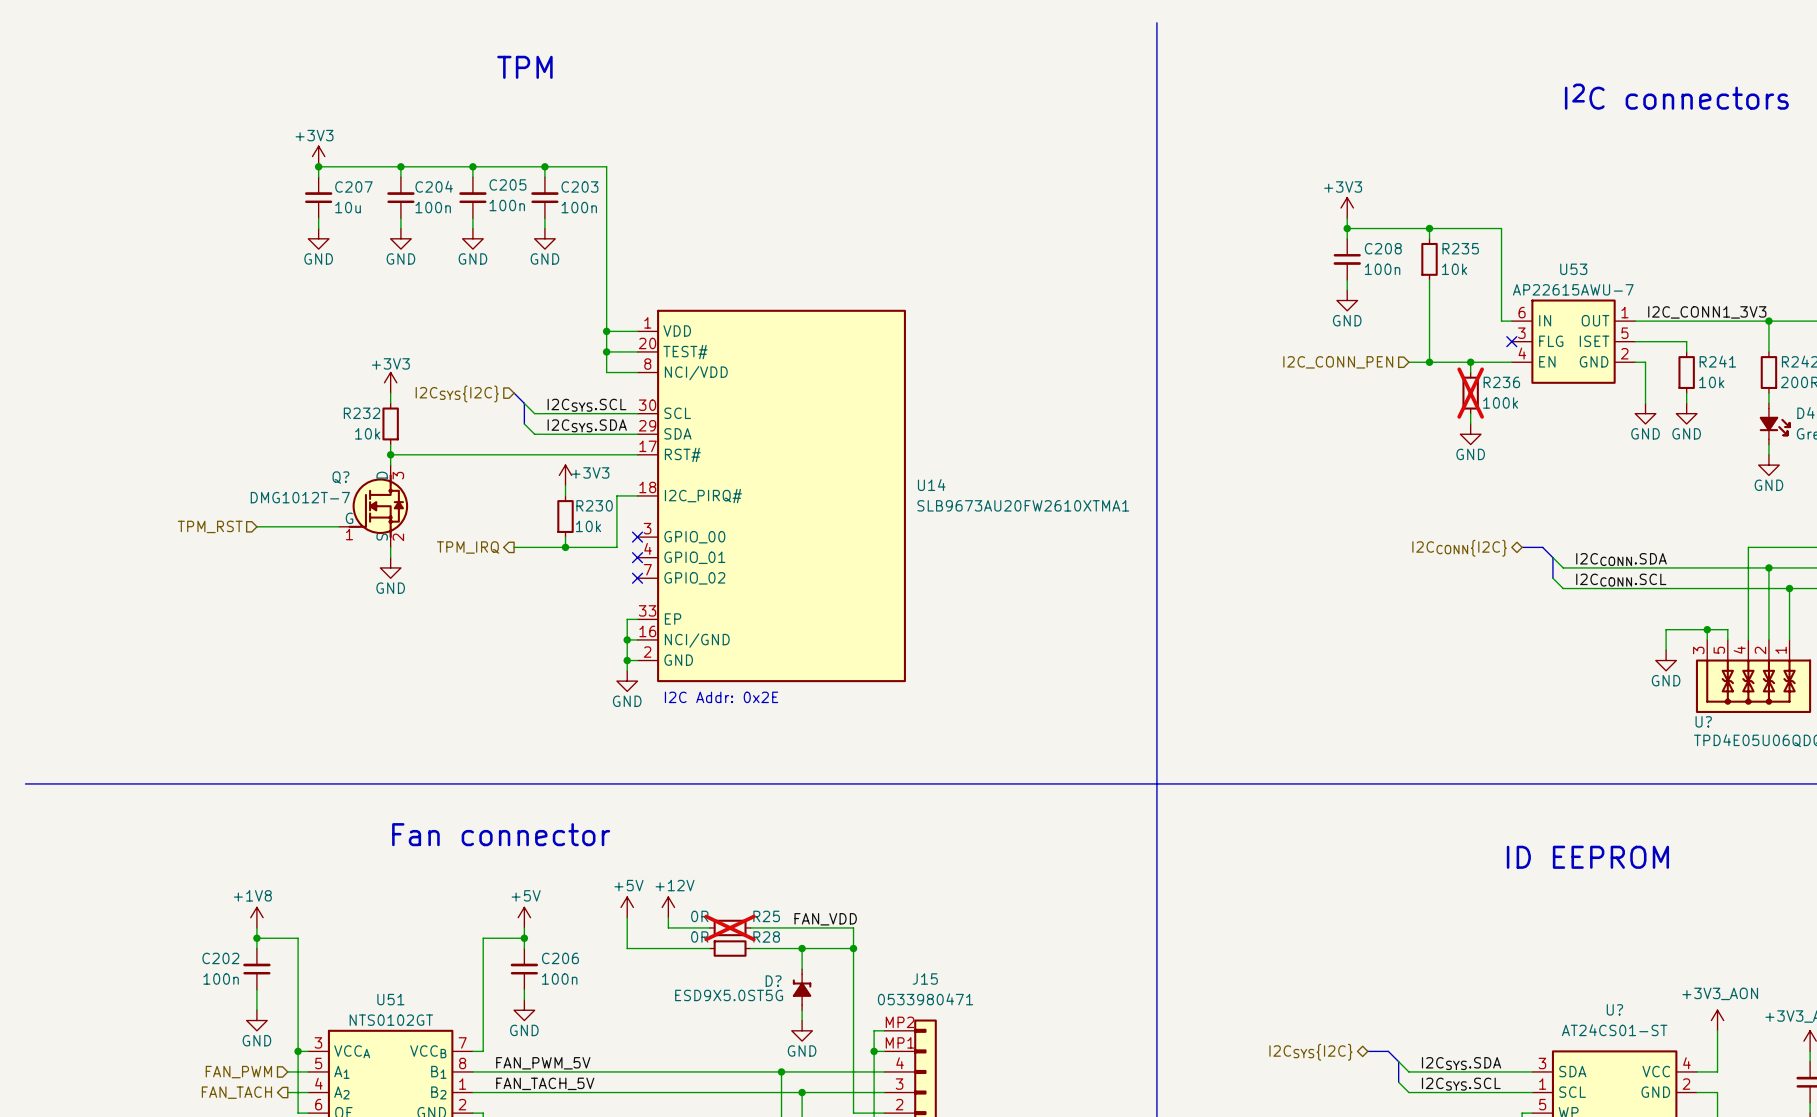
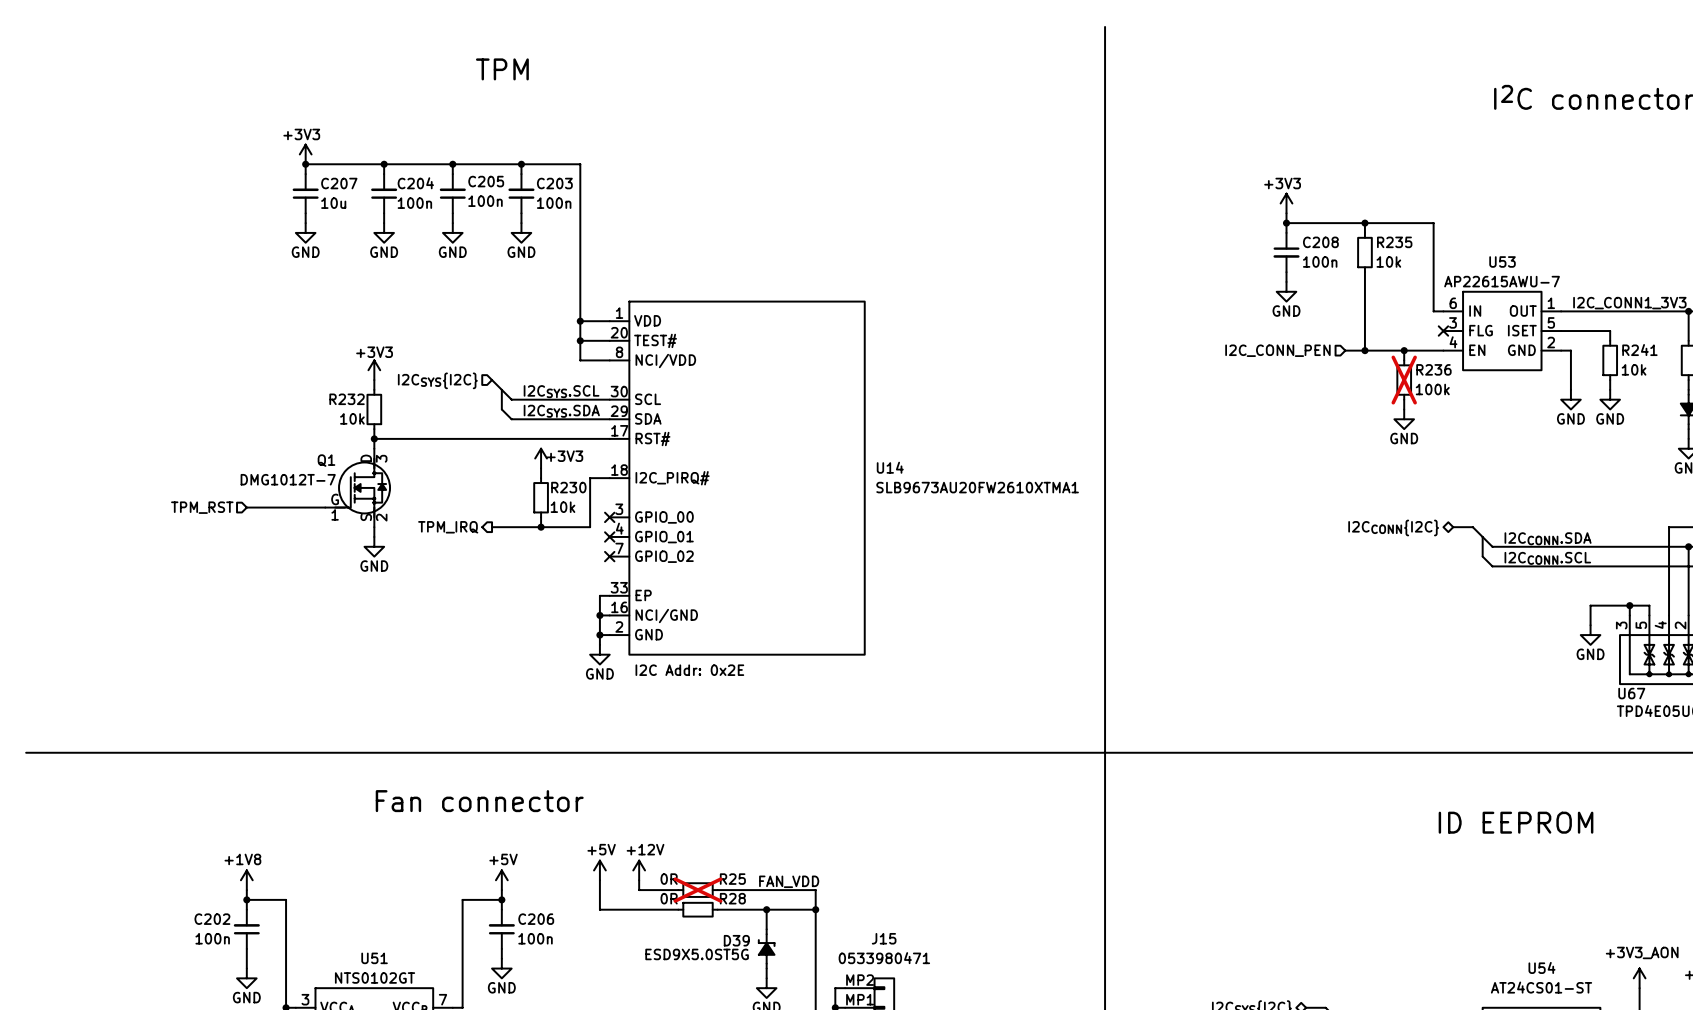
Q? name: Q? (340, 477) -> Q1 (326, 460)
U? name: U? (1703, 721) -> U67 (1631, 693)
D? name: D? (773, 981) -> D39 (736, 940)
U? name: U? (1614, 1009) -> U54 (1541, 967)

